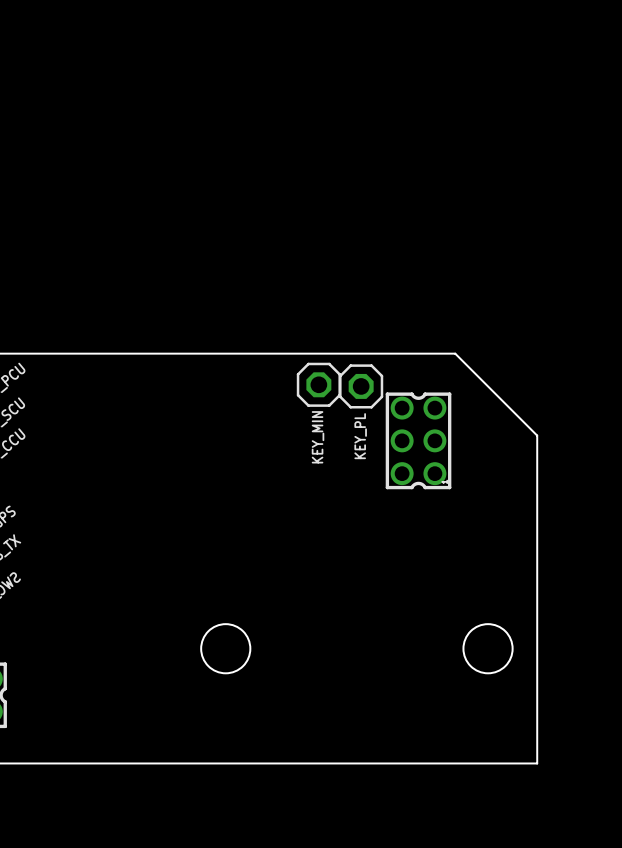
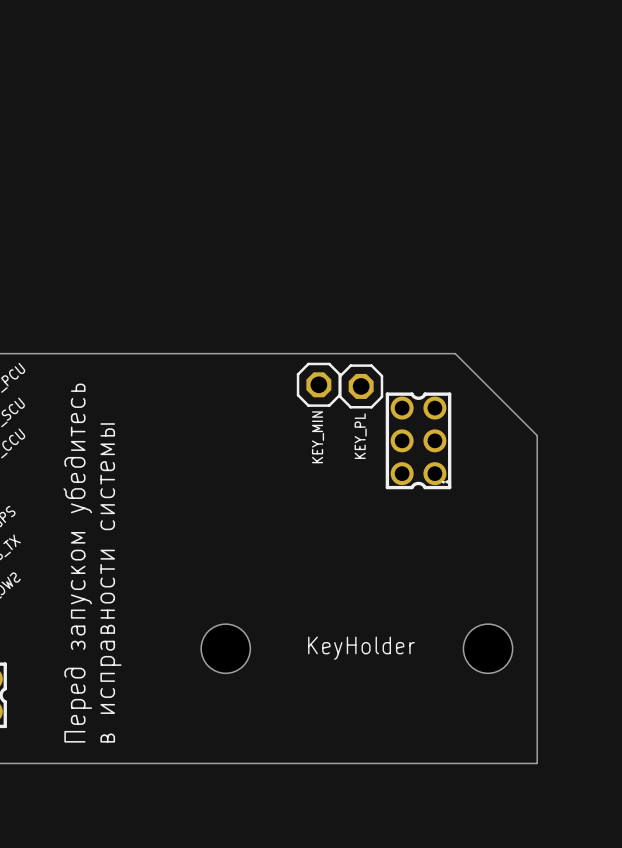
text: none -> Перед запуском убедитесь (77, 563)
text: none -> в исправности системы (111, 582)
text: none -> KeyHolder (361, 648)

